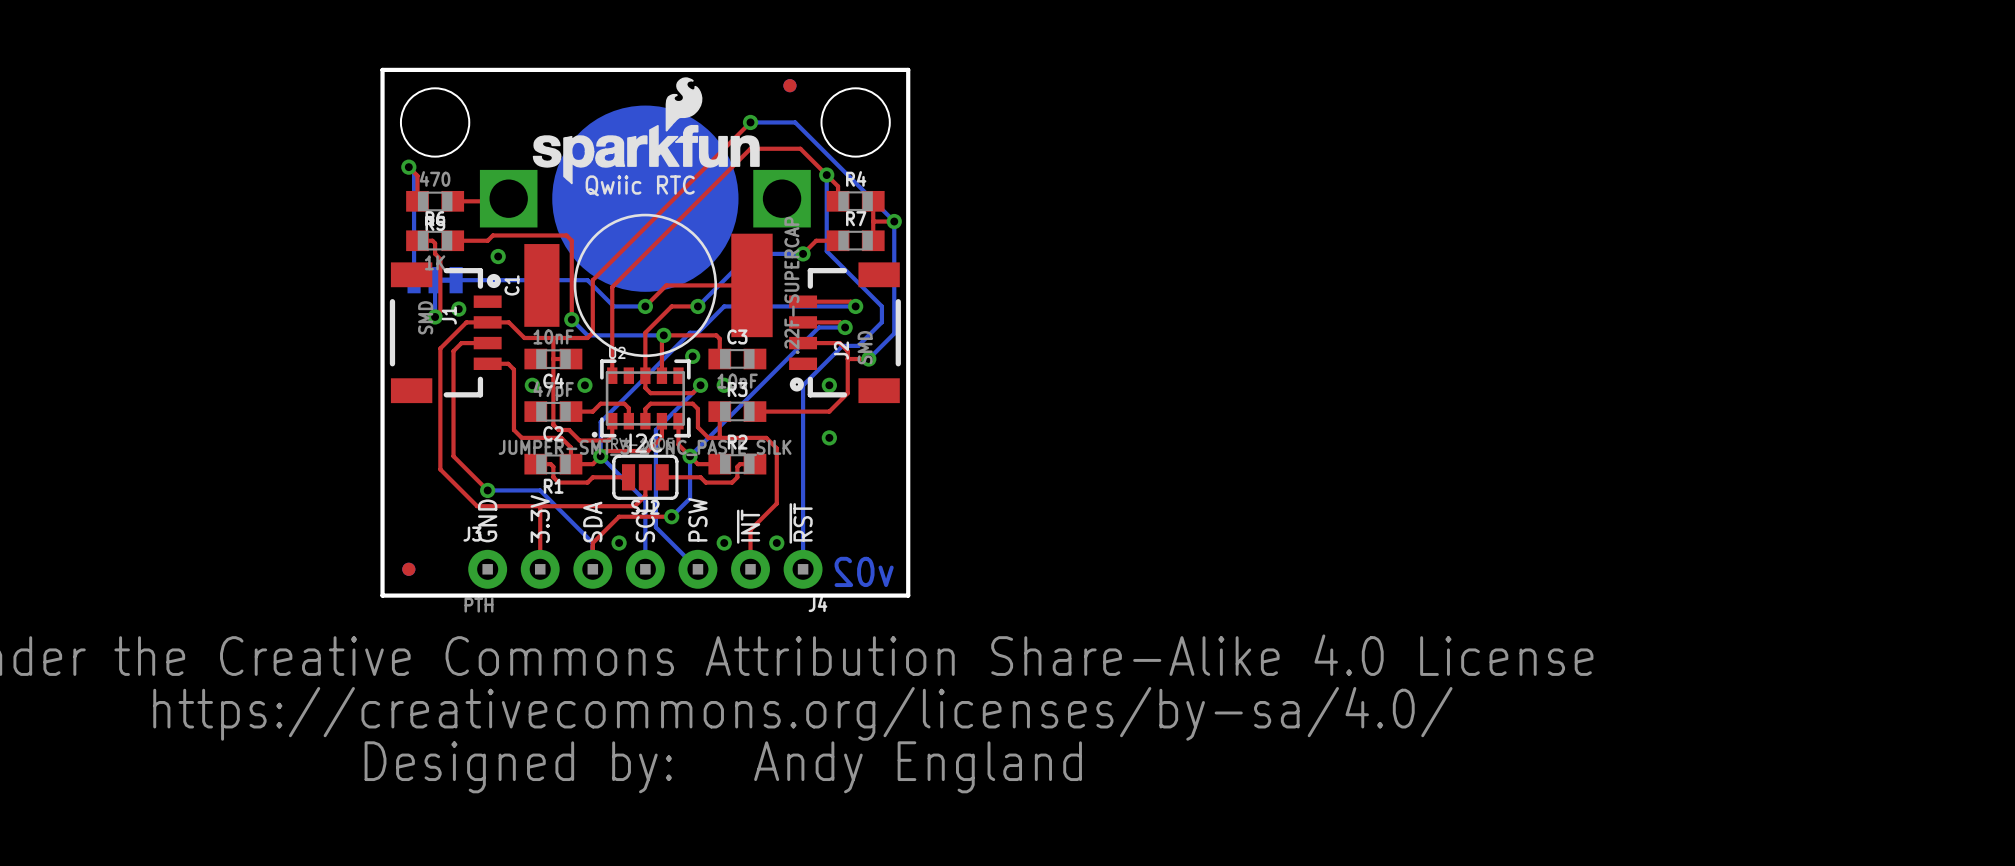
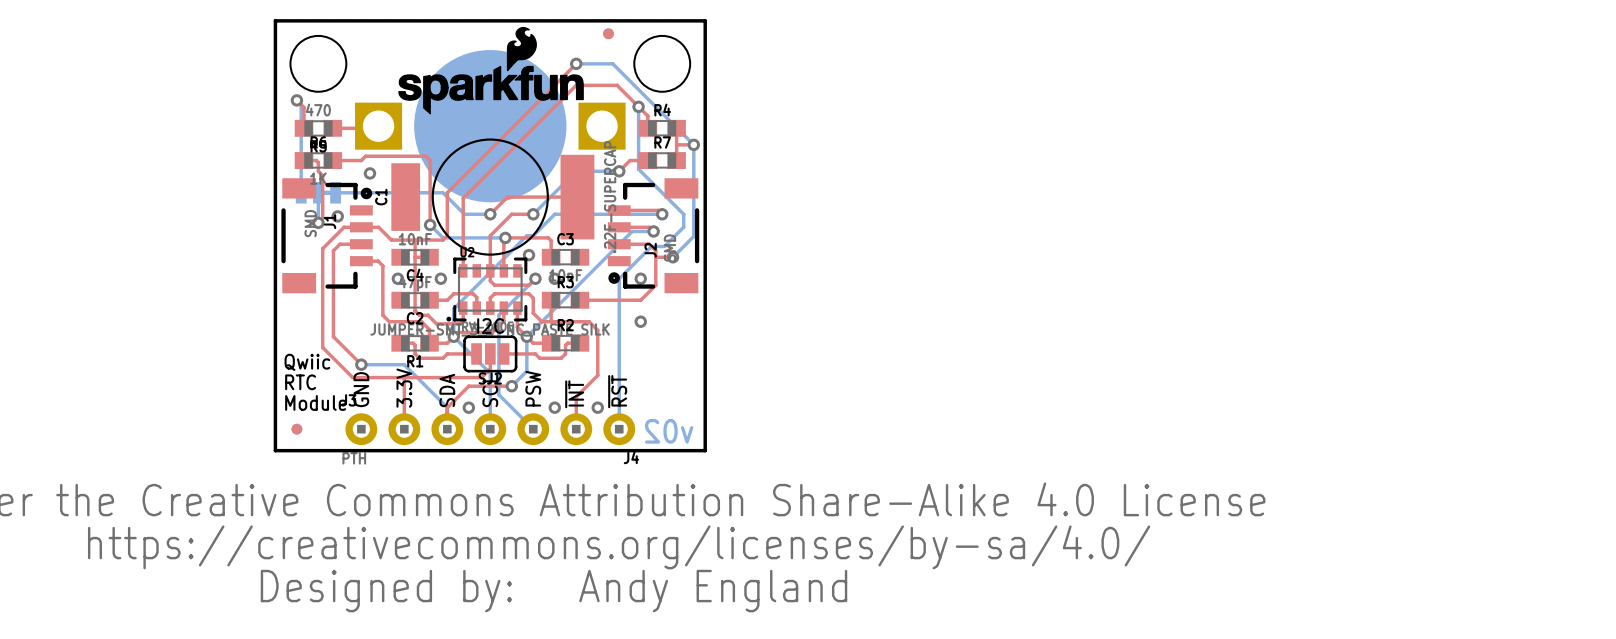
text: Qwiic RTC (640, 185) -> none
text: none -> Qwiic (307, 362)
text: none -> RTC (300, 382)
text: none -> Module (315, 402)

